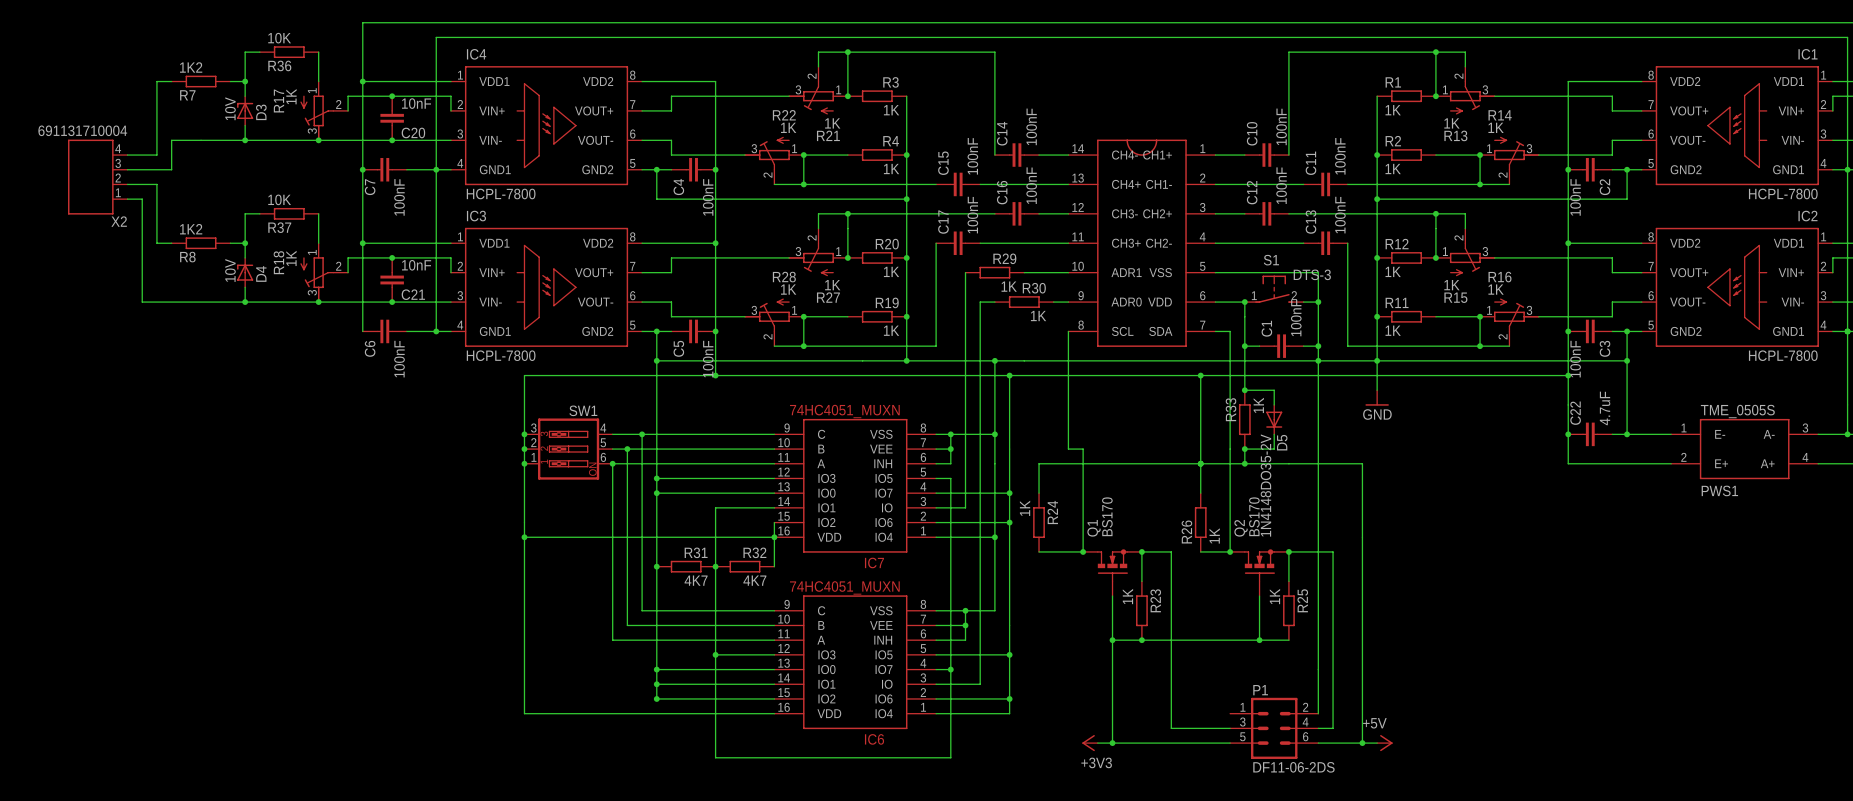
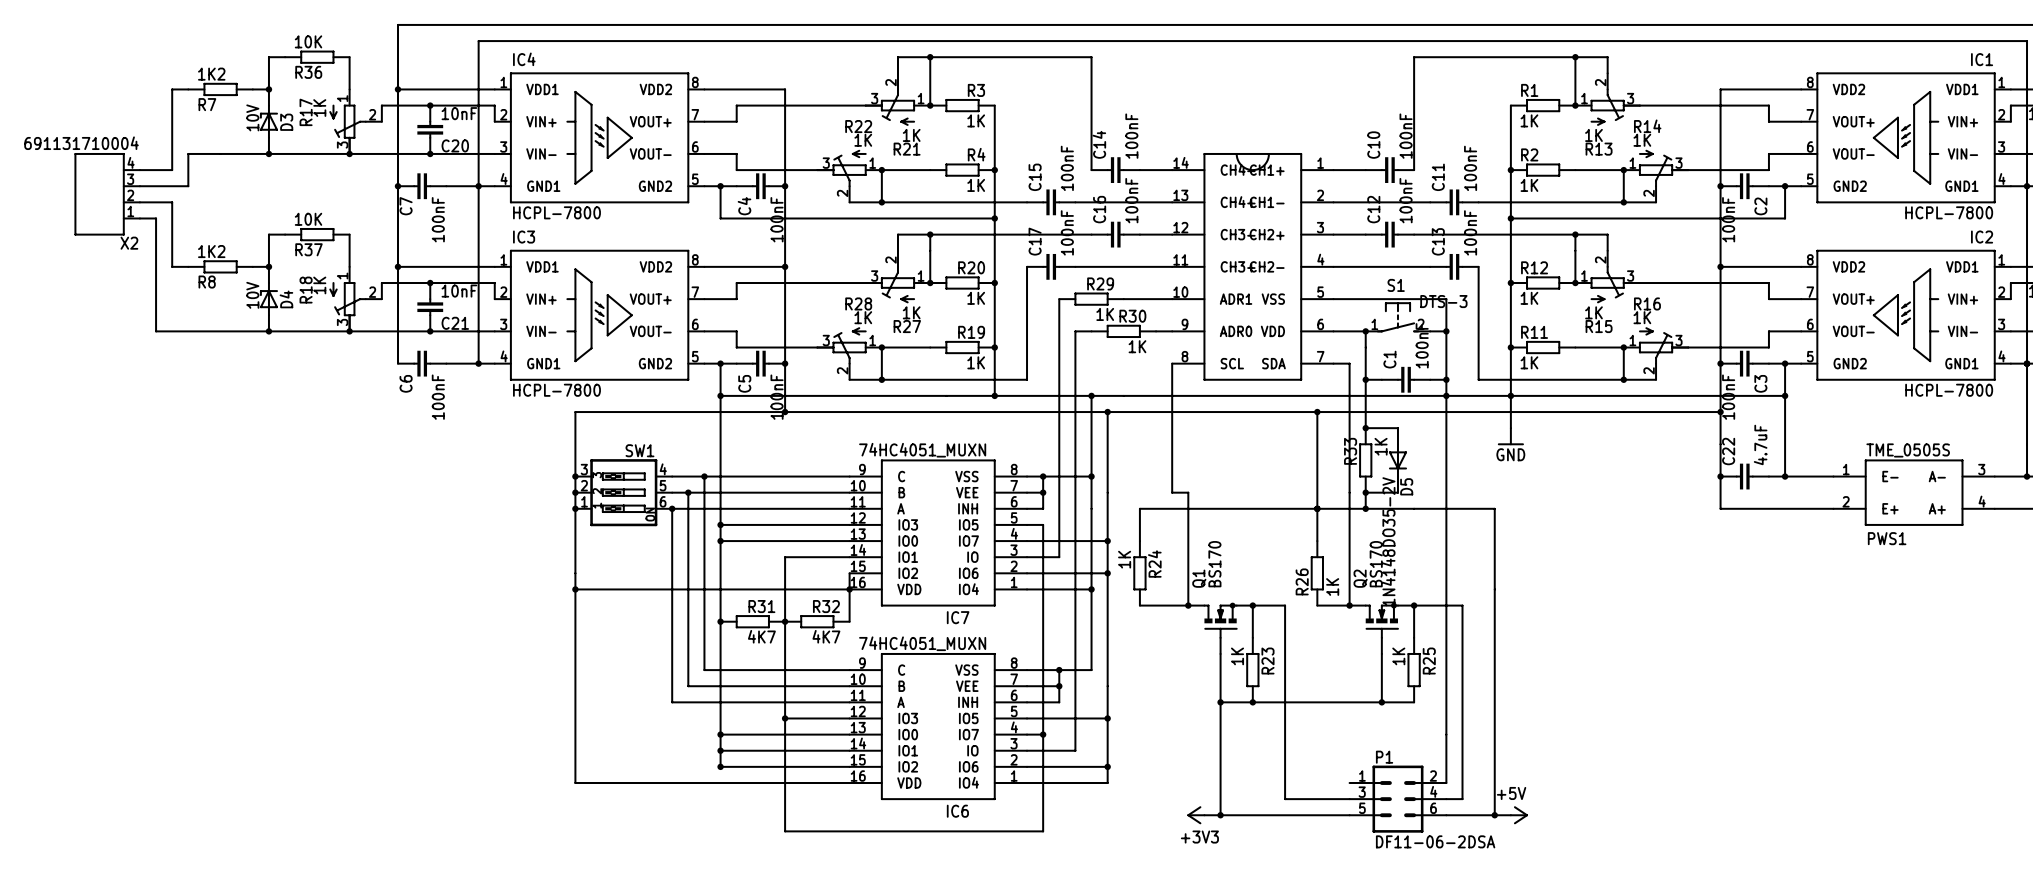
P1 value: DF11-06-2DS (1293, 767) -> DF11-06-2DSA (1435, 841)

